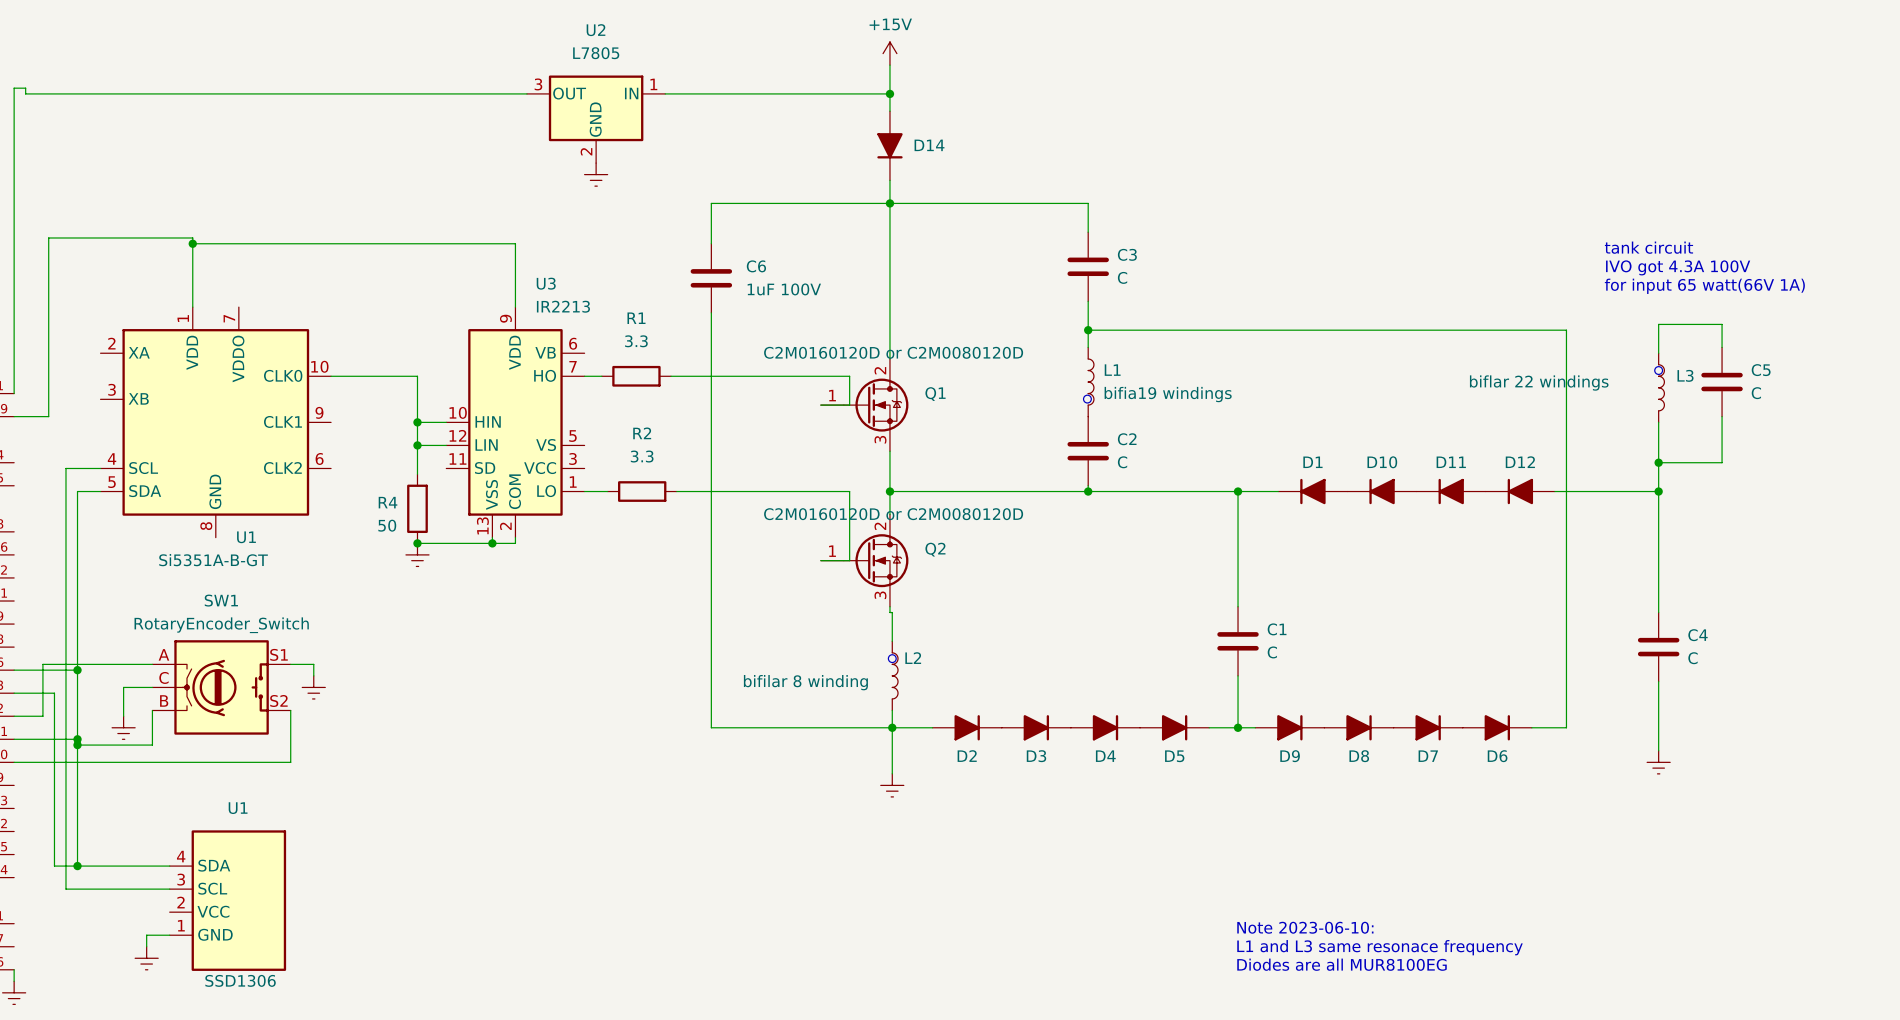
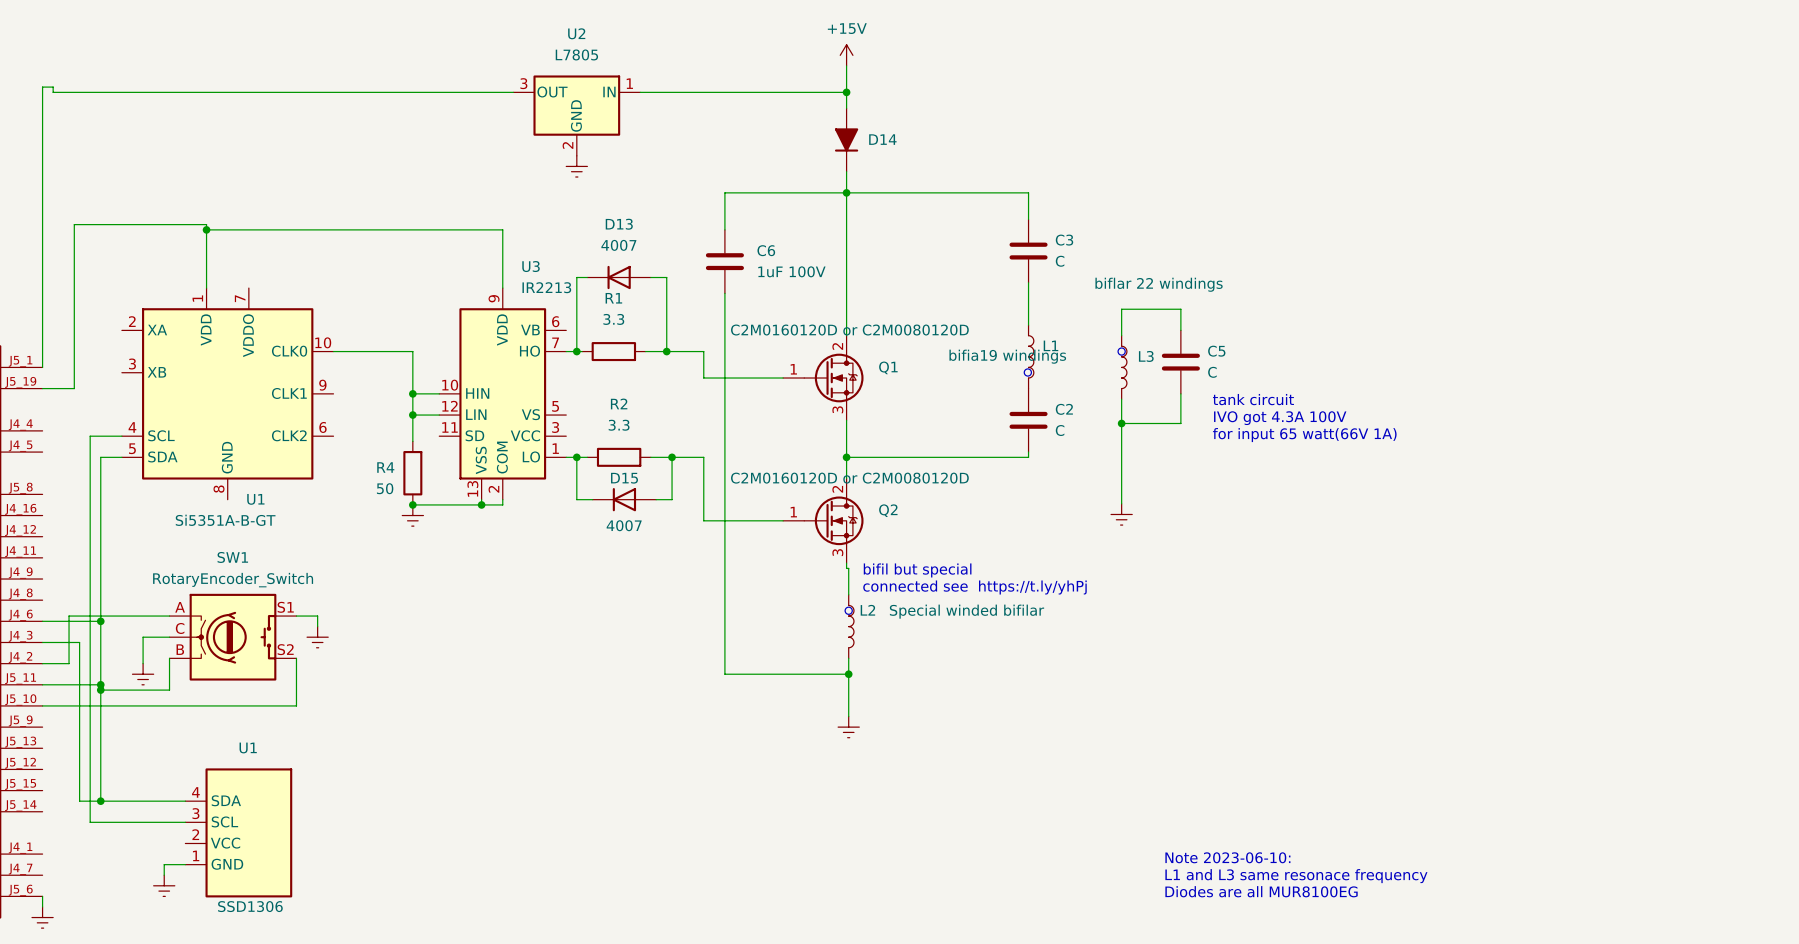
wire: (757, 203) (711, 203) (711, 243) -> (724, 192) (724, 229)
text: tank circuit (1648, 247) -> none
text: IVO got 4.3A 100V (1678, 267) -> none
C6 position: (711, 278) -> (724, 261)
text: for input 65 watt(66V 1A) (1704, 286) -> none
wire: none -> (587, 277) (576, 277) (576, 351)
D13: none -> 4007 (619, 277)
wire: none -> (650, 277) (666, 277) (666, 351)
wire: (711, 312) (711, 727) (757, 727) -> (724, 293) (724, 674)
wire: (1088, 330) (1189, 330) -> (1121, 335) (1121, 309)
junction: (1088, 330) -> none
wire: (1254, 330) (1566, 330) (1566, 727) (1531, 727) -> (1180, 309) (1180, 330)
wire: (1722, 347) (1722, 324) (1658, 324) (1658, 353) -> none
drawing: [1654, 366, 1663, 375] -> none
drawing: none -> [1118, 347, 1126, 356]
junction: none -> (576, 351)
junction: none -> (666, 351)
wire: (734, 376) (849, 376) (849, 405) (820, 405) -> (703, 351) (703, 378) (783, 378)
C5 position: (1722, 382) -> (1180, 362)
L3 value position: biflar 22 windings (1539, 383) -> biflar 22 windings (1159, 284)
L3 position: (1661, 387) -> (1124, 367)
L1 value position: bifia19 windings (1168, 394) -> bifia19 windings (1007, 356)
wire: (1722, 416) (1722, 462) (1658, 462) -> none
wire: none -> (1180, 393) (1180, 423) (1121, 423)
wire: (1658, 422) (1658, 612) -> none
wire: none -> (1121, 399) (1121, 503)
text: none -> tank circuit (1253, 399)
text: none -> IVO got 4.3A 100V (1280, 418)
junction: none -> (1121, 423)
junction: (1658, 462) -> none
text: none -> for input 65 watt(66V 1A) (1304, 435)
wire: none -> (576, 457) (576, 499) (592, 499)
junction: none -> (576, 457)
wire: none -> (672, 457) (672, 499) (656, 499)
junction: none -> (672, 457)
wire: (734, 491) (849, 491) (849, 560) (820, 560) -> (703, 457) (703, 520) (783, 520)
wire: (1088, 491) (1278, 491) -> none
junction: (1088, 491) -> none
wire: (1238, 491) (1238, 606) -> none
junction: (1238, 491) -> none
D1: (1312, 491) -> none
D10: (1382, 491) -> none
D11: (1451, 491) -> none
D12: (1520, 491) -> none
wire: (1554, 491) (1658, 491) -> none
junction: (1658, 491) -> none
D15: none -> 4007 (624, 499)
power symbol: none -> (1121, 514)
text: none -> bifil but special (917, 570)
text: none -> connected see https://t.ly/yhPj (974, 587)
C1: C (1238, 641) -> none
C4: C (1658, 647) -> none
wire: (1238, 675) (1238, 727) -> none
wire: (1658, 681) (1658, 750) -> none
L2 value: bifilar 8 winding (805, 682) -> Special winded bifilar (966, 611)
wire: (892, 727) (932, 727) -> none
D2: (967, 727) -> none
D3: (1036, 727) -> none
D4: (1105, 727) -> none
D5: (1174, 727) -> none
wire: (1209, 727) (1255, 727) -> none
junction: (1238, 727) -> none
D9: (1289, 727) -> none
D8: (1359, 727) -> none
D7: (1428, 727) -> none
D6: (1497, 727) -> none
power symbol: (1658, 762) -> none

